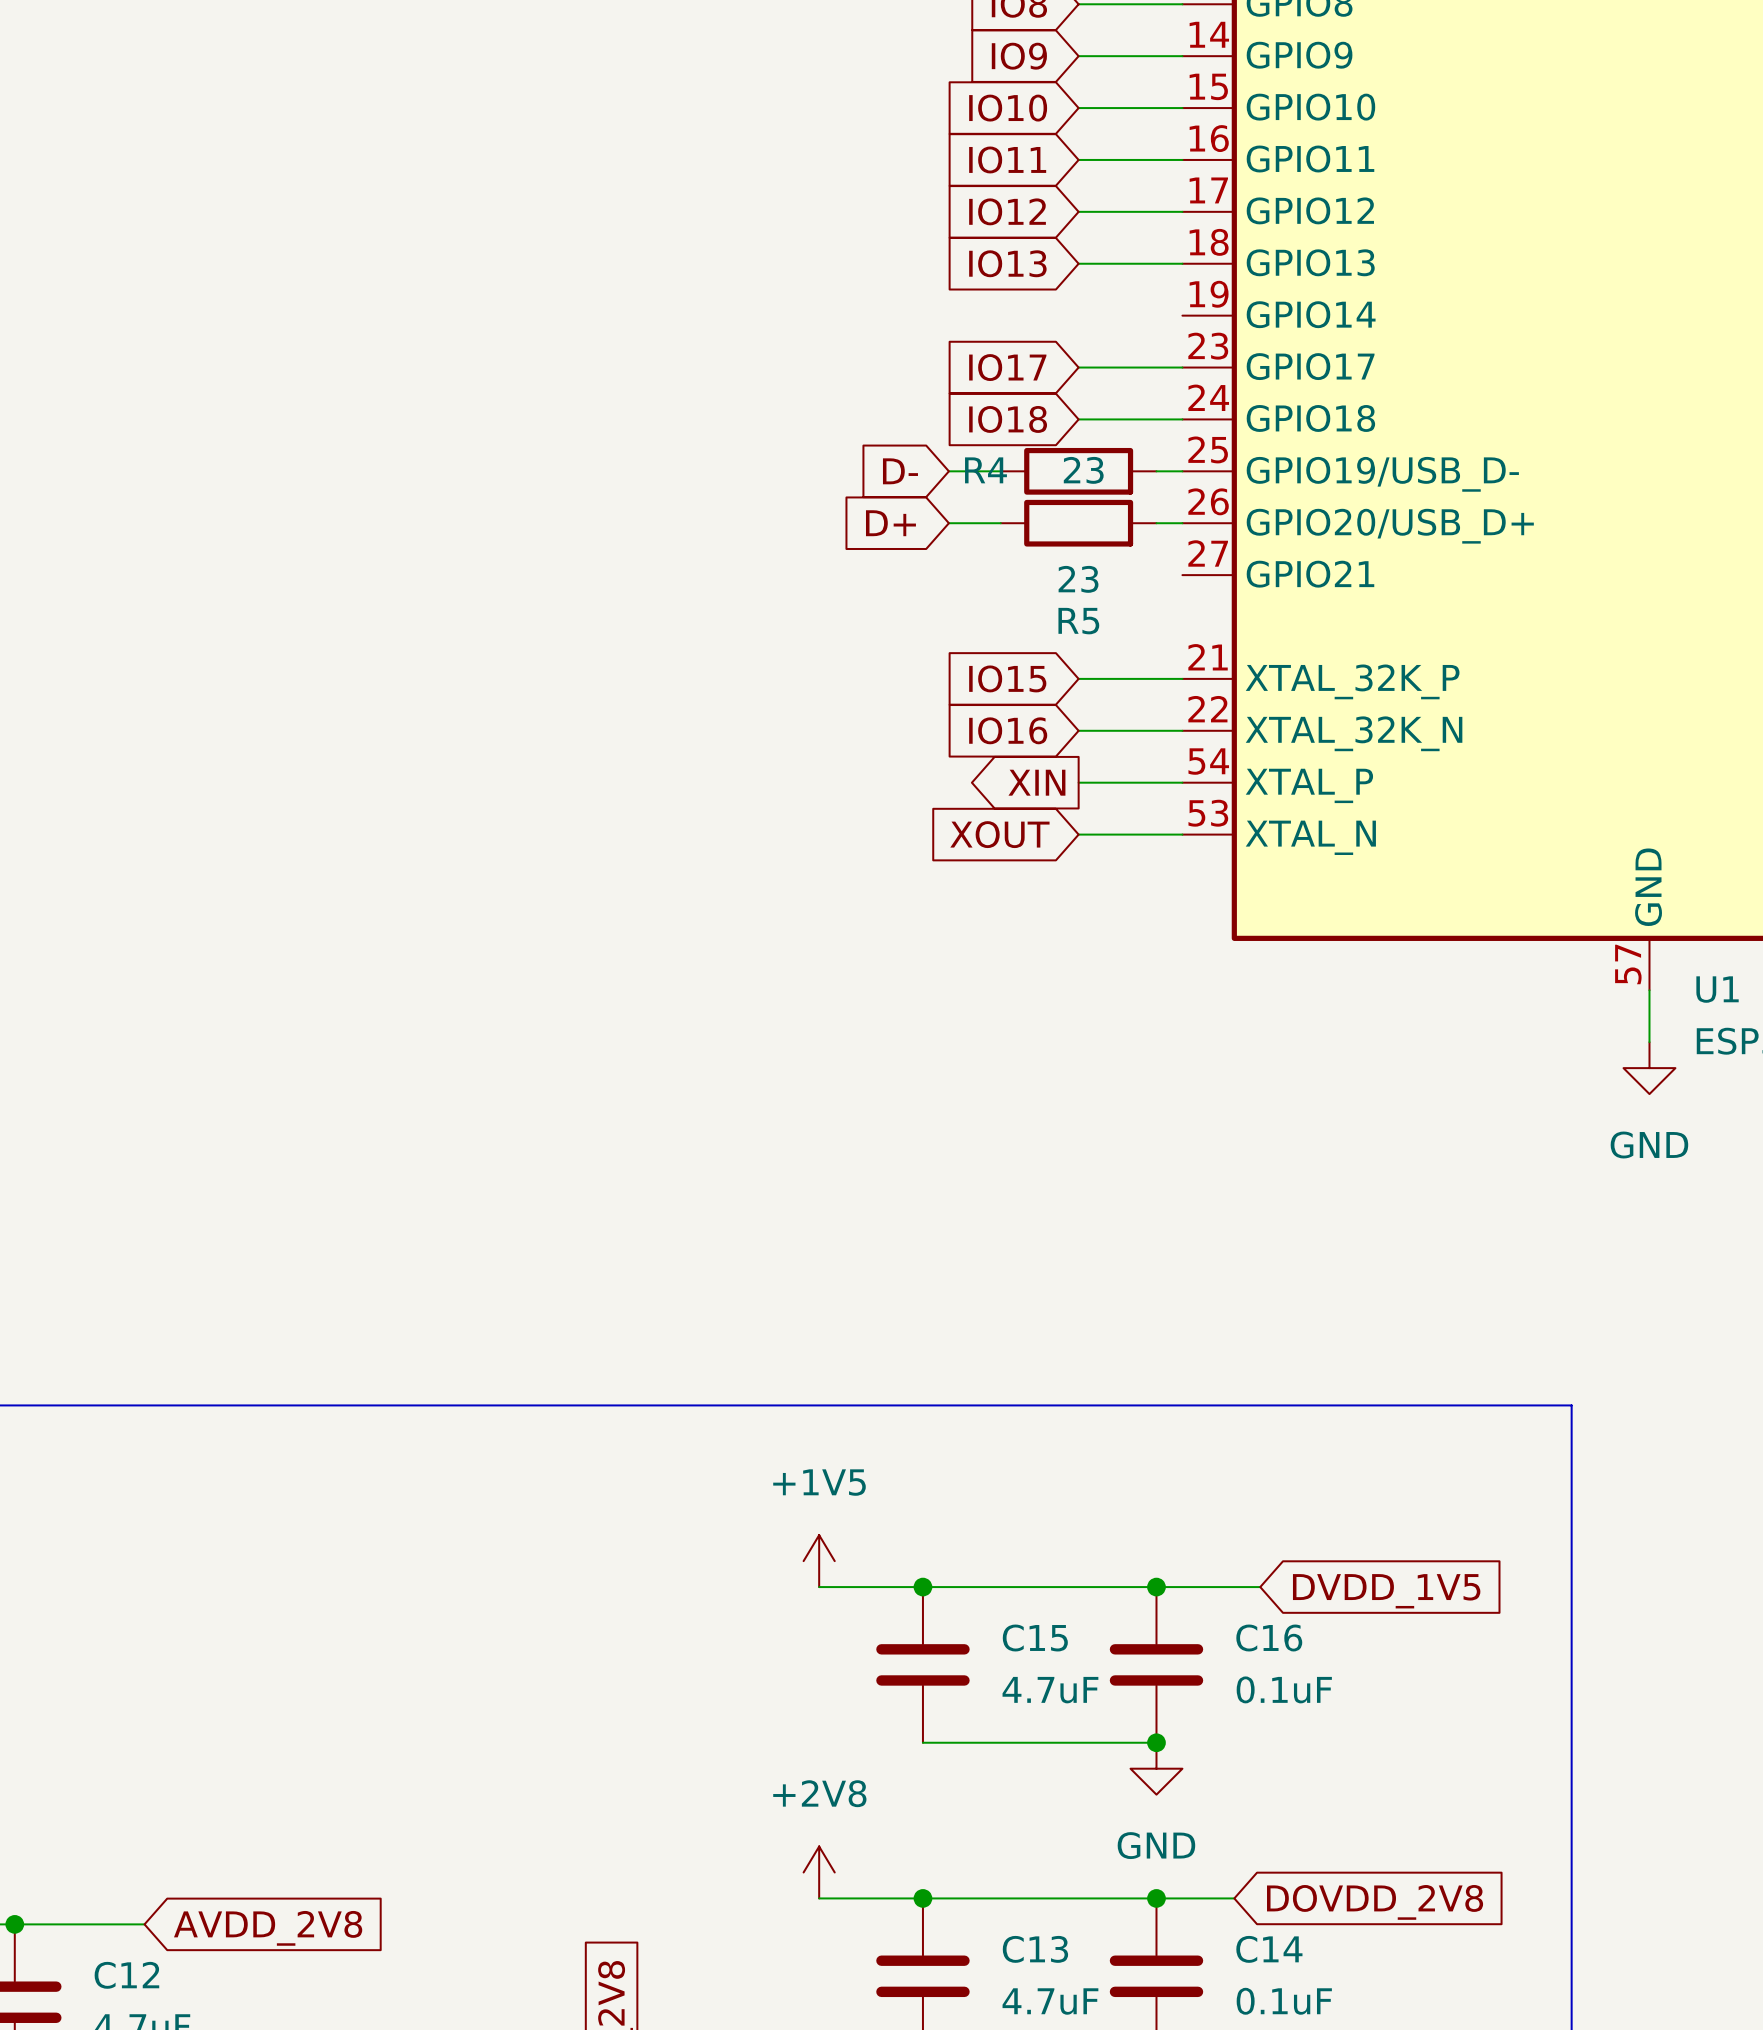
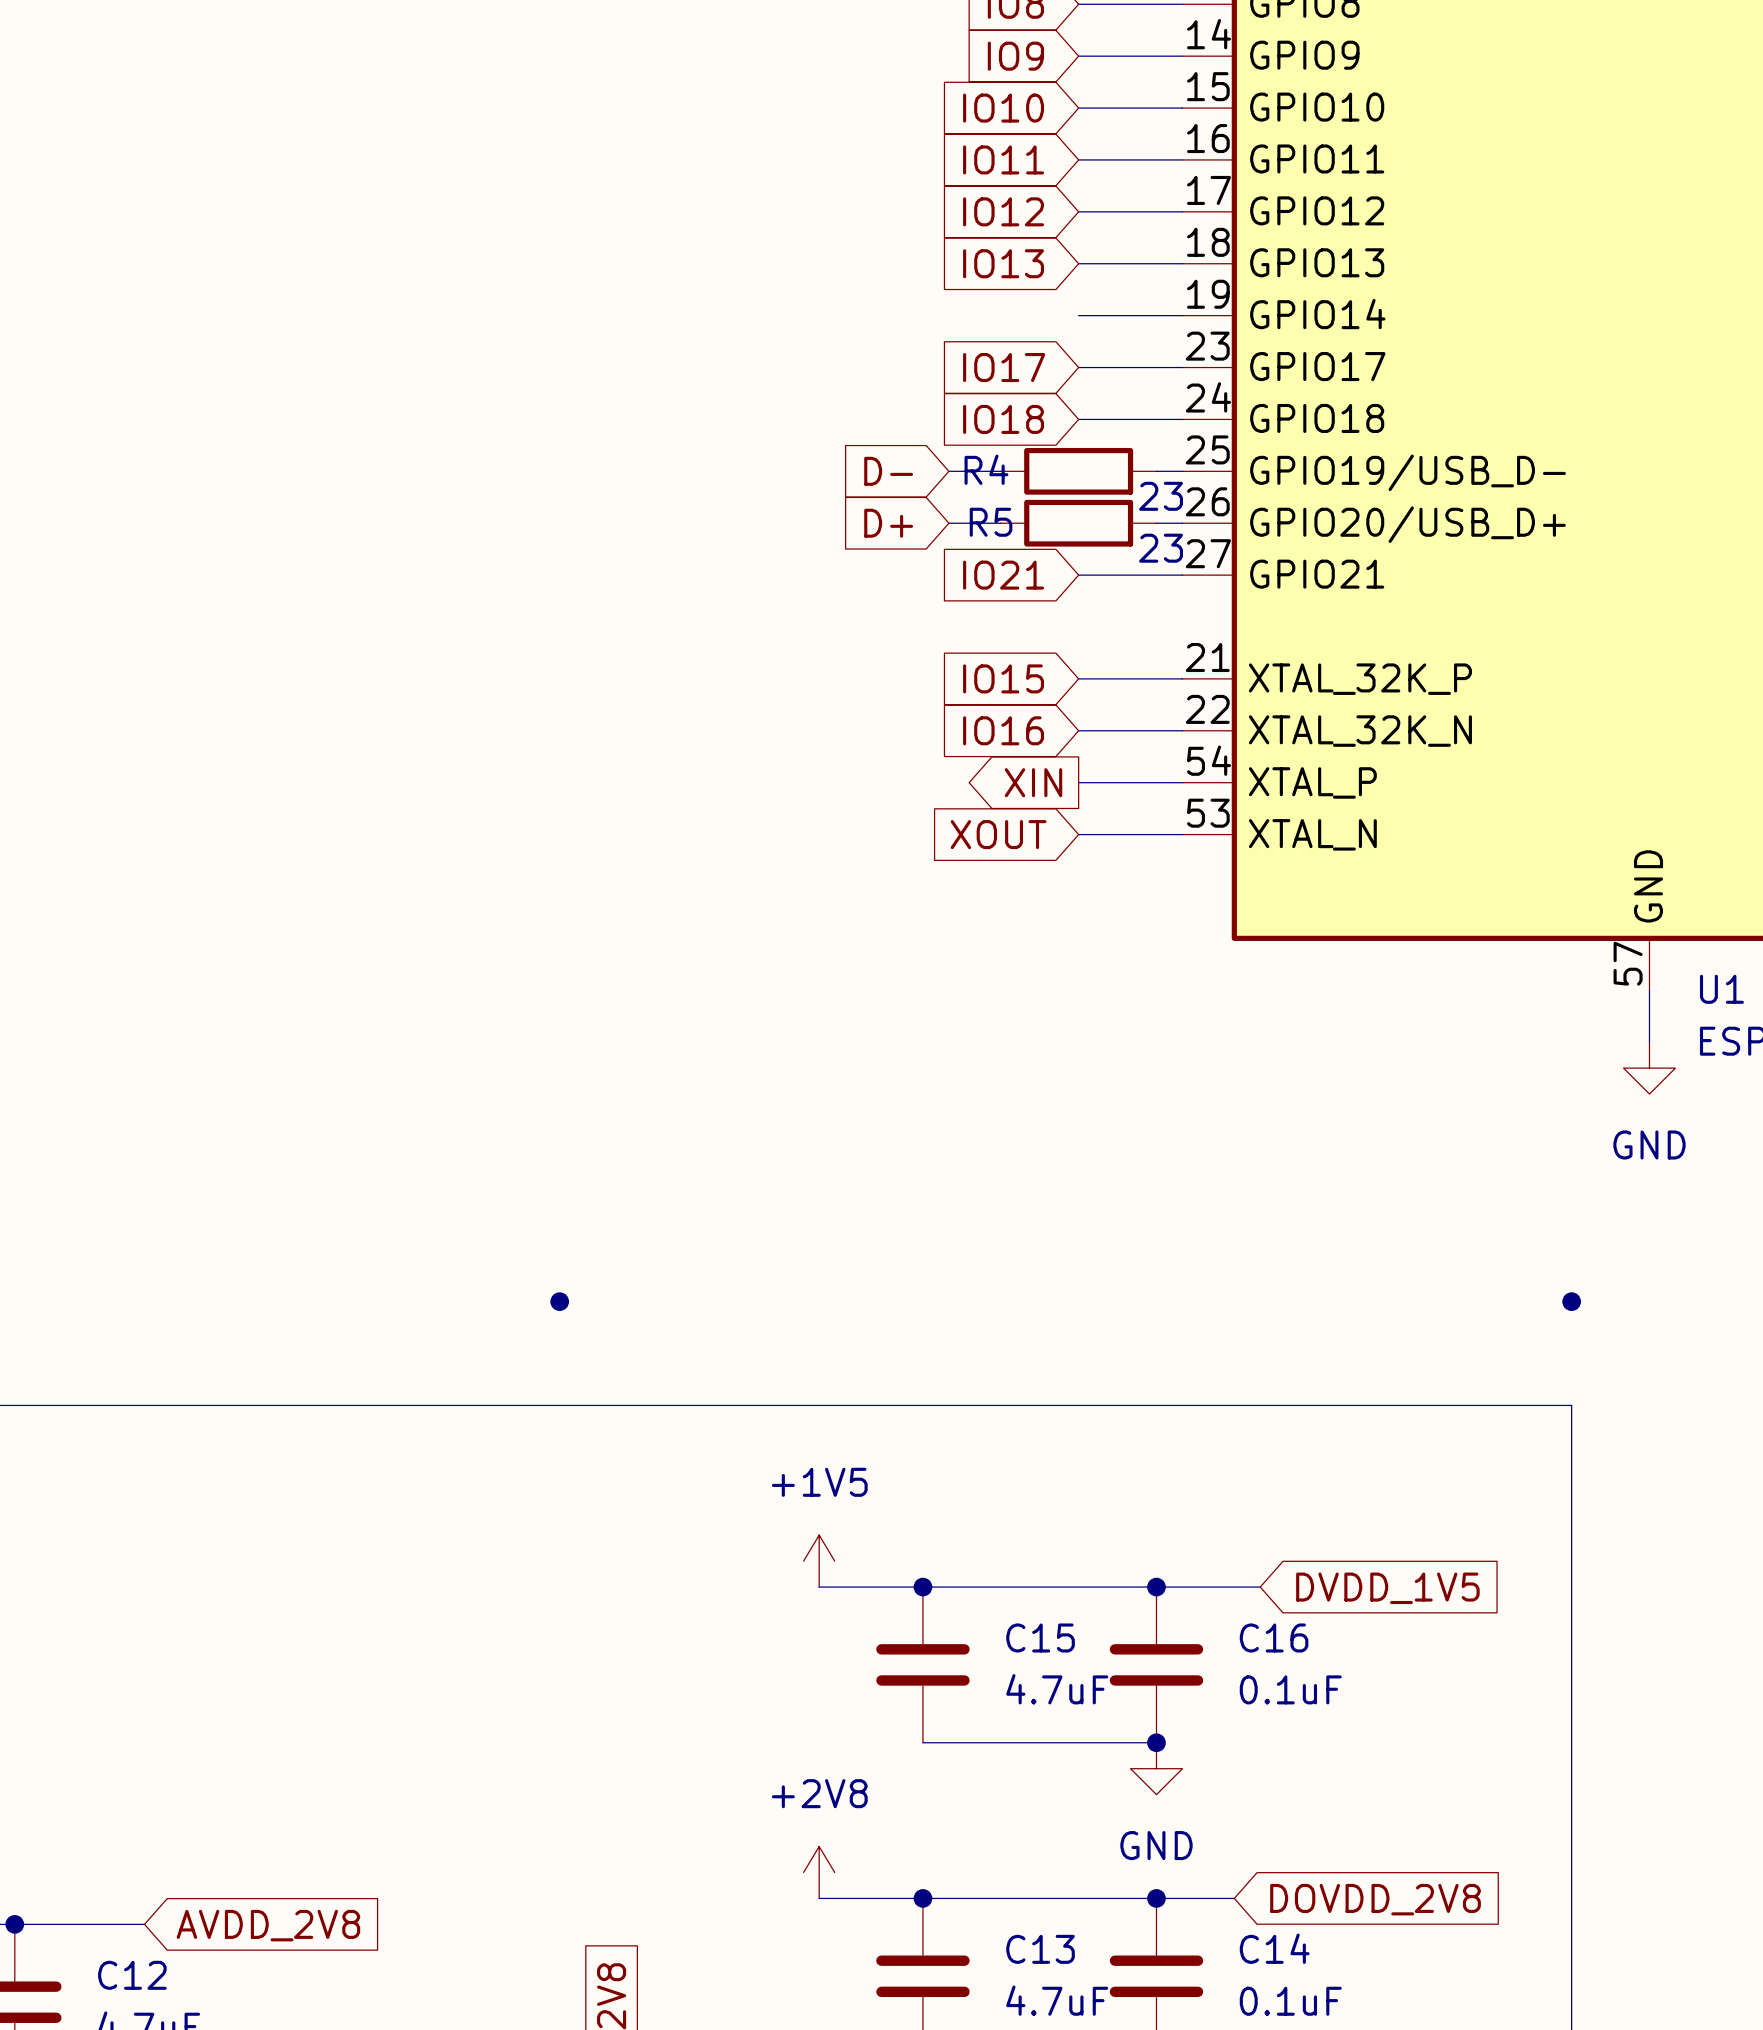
wire: none -> (1078, 315) (1182, 315)
R4 value position: 23 (1083, 470) -> 23 (1161, 496)
global label: none -> IO21 (1003, 575)
wire: none -> (1078, 575) (1182, 575)
R5 value position: 23 (1078, 579) -> 23 (1161, 548)
R5 name position: R5 (1078, 621) -> R5 (991, 522)
junction: none -> (559, 1301)
junction: none -> (1571, 1301)

